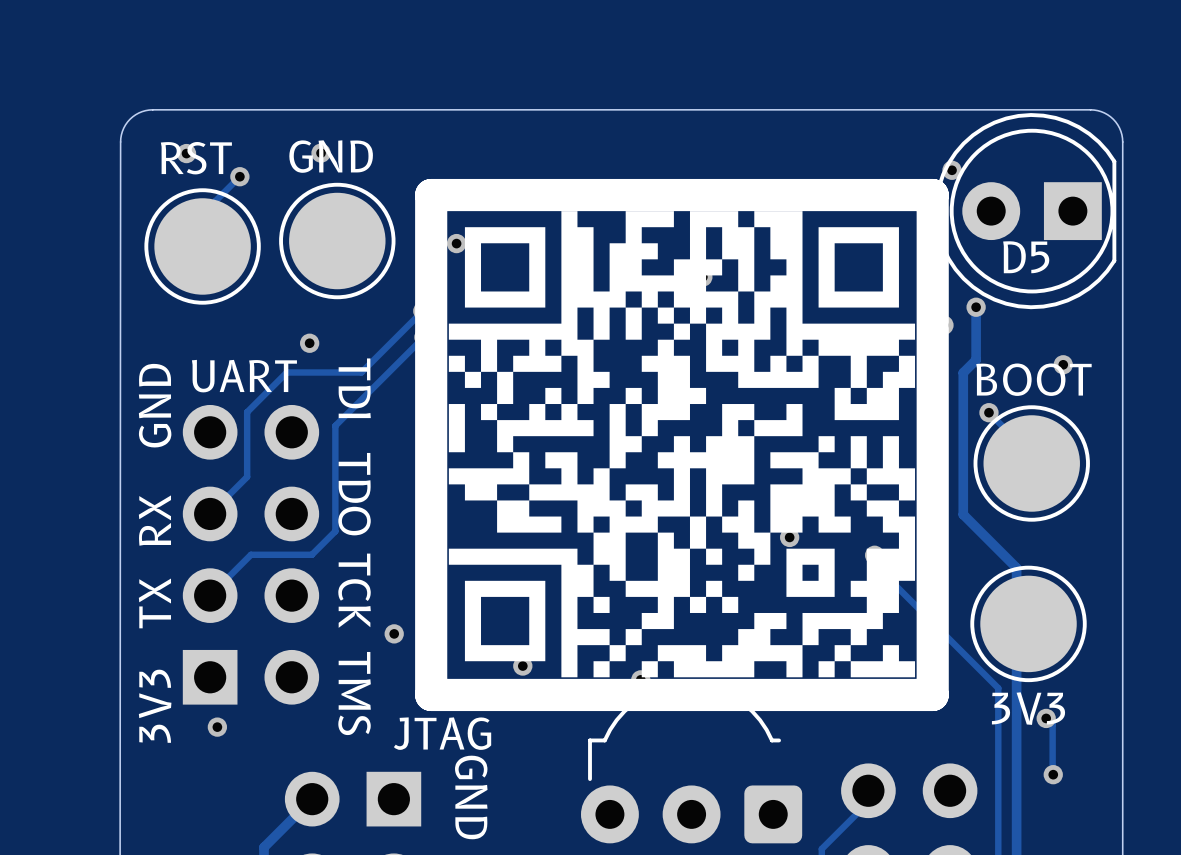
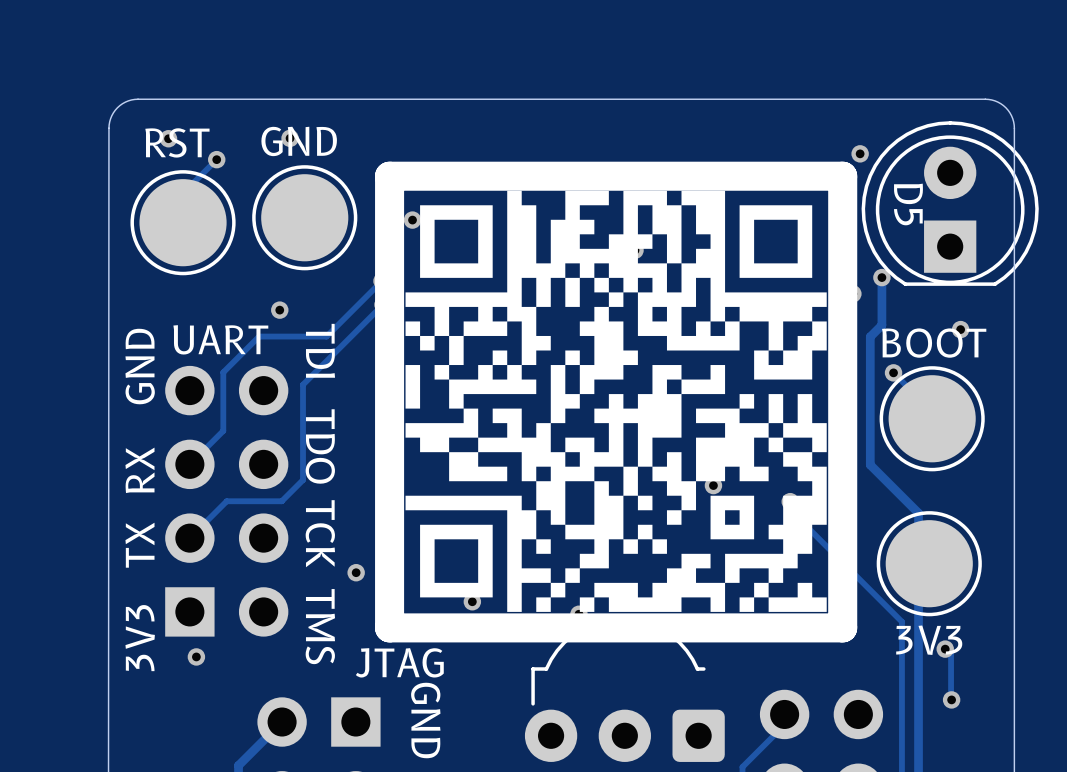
D5 rotation: 0° (1025, 211) -> 90° clockwise (950, 203)

